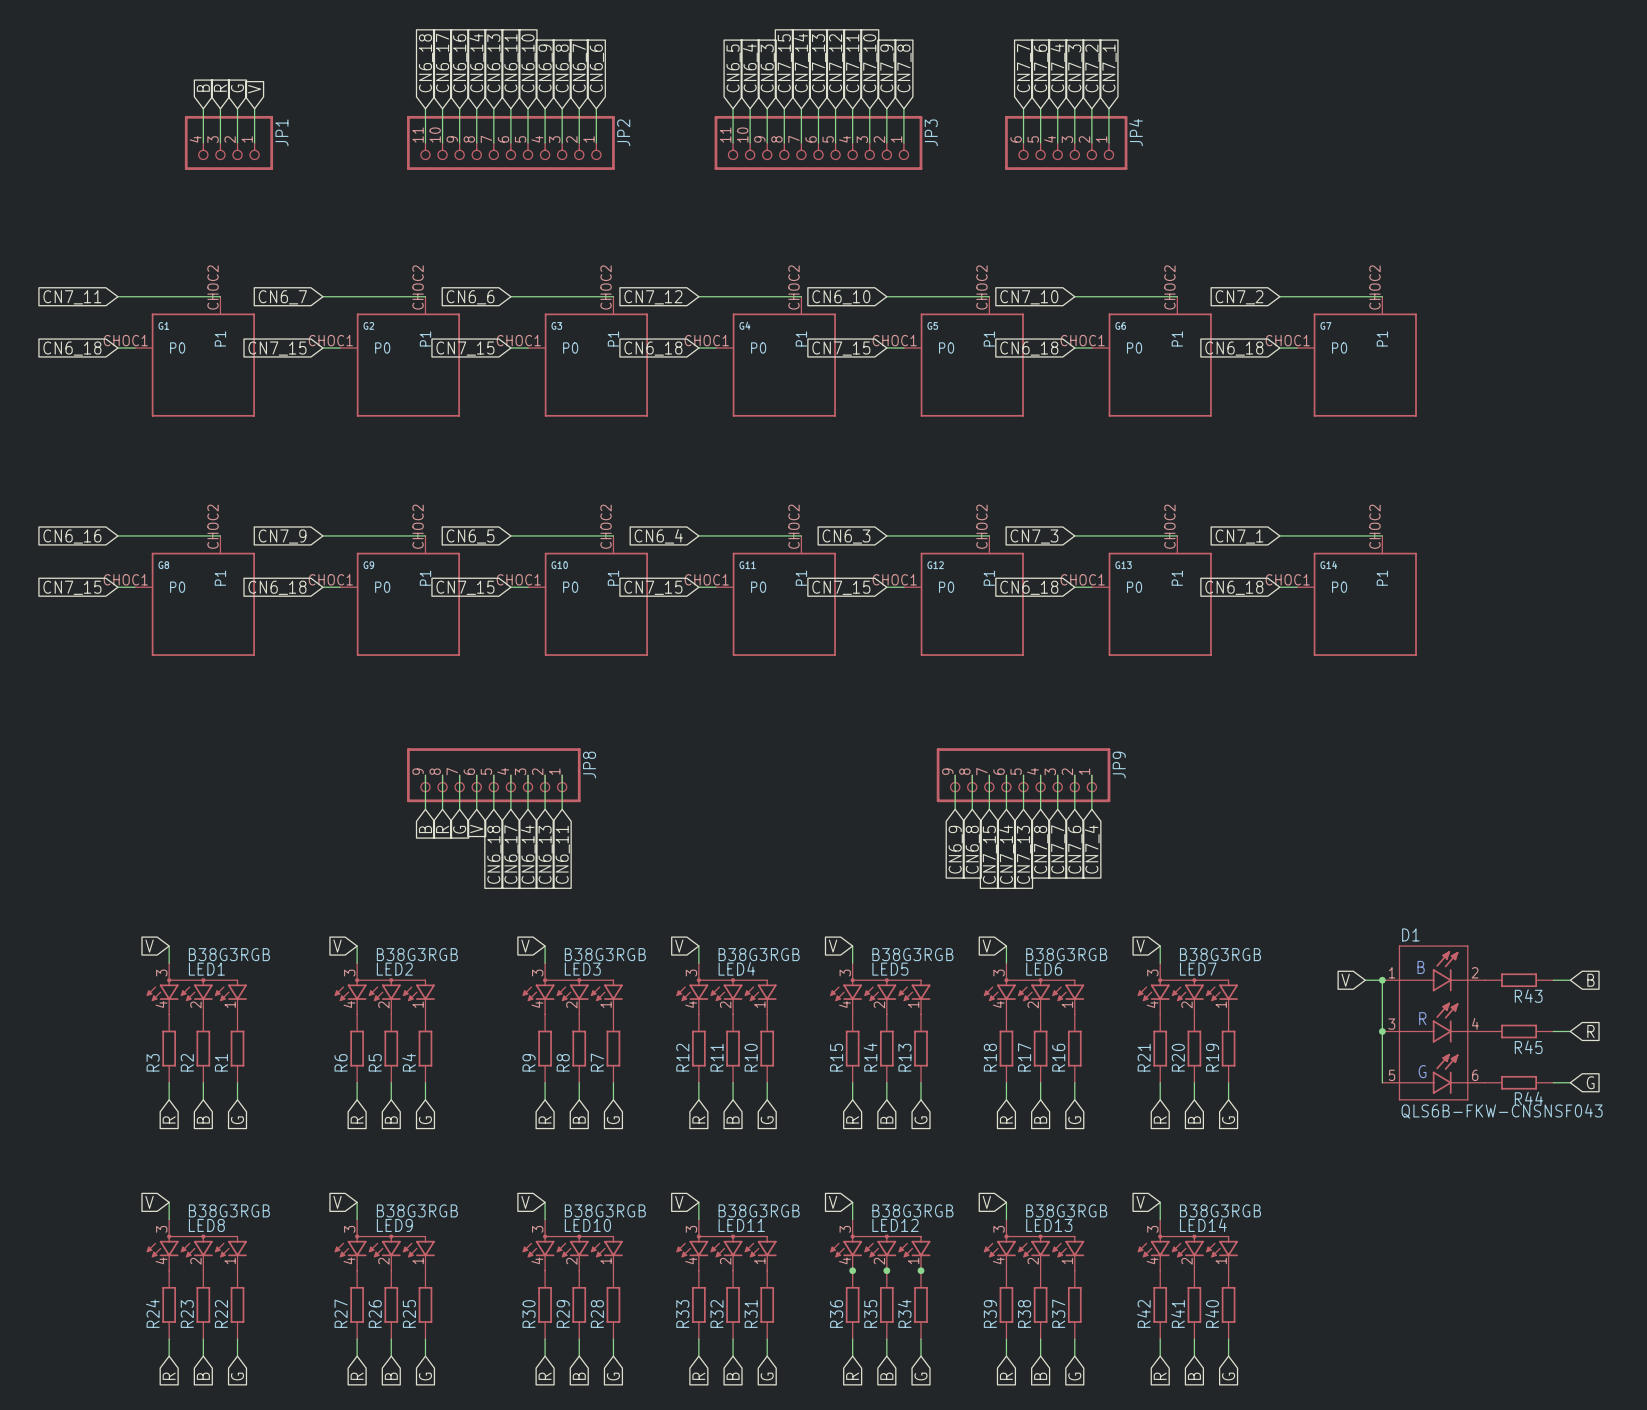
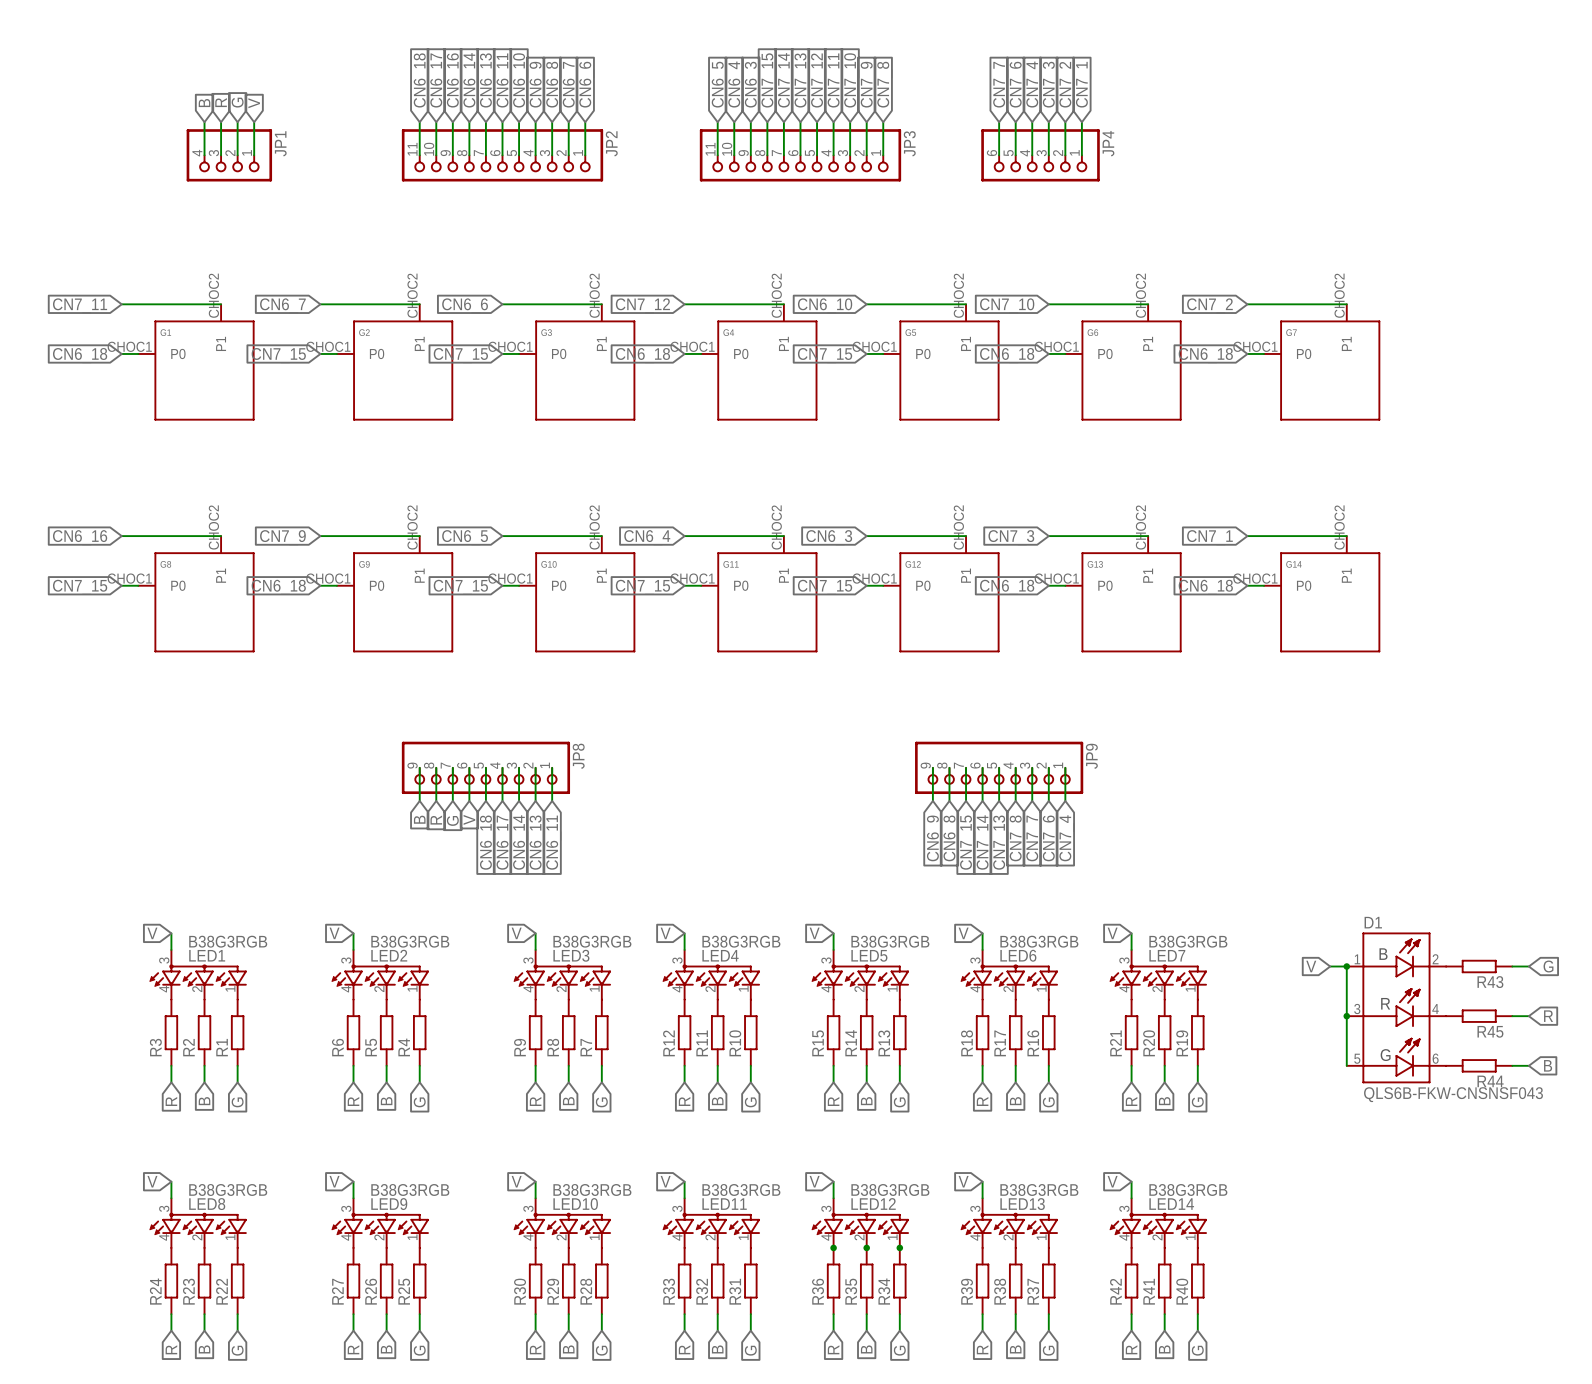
global label: B (1590, 980) -> G (1548, 966)
global label: G (1590, 1082) -> B (1548, 1065)

